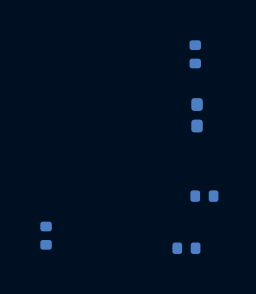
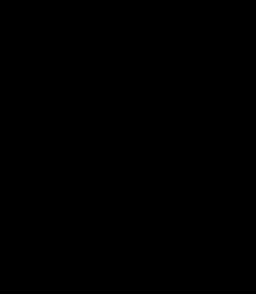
part: (195, 54) -> none
part: (197, 115) -> none
part: (204, 196) -> none
part: (46, 235) -> none
part: (186, 248) -> none

